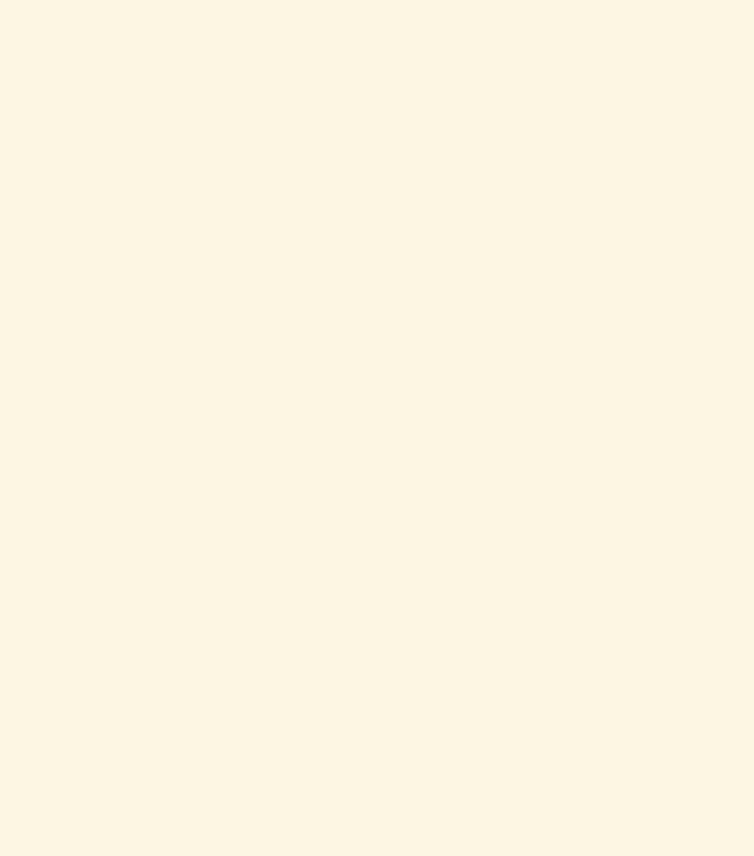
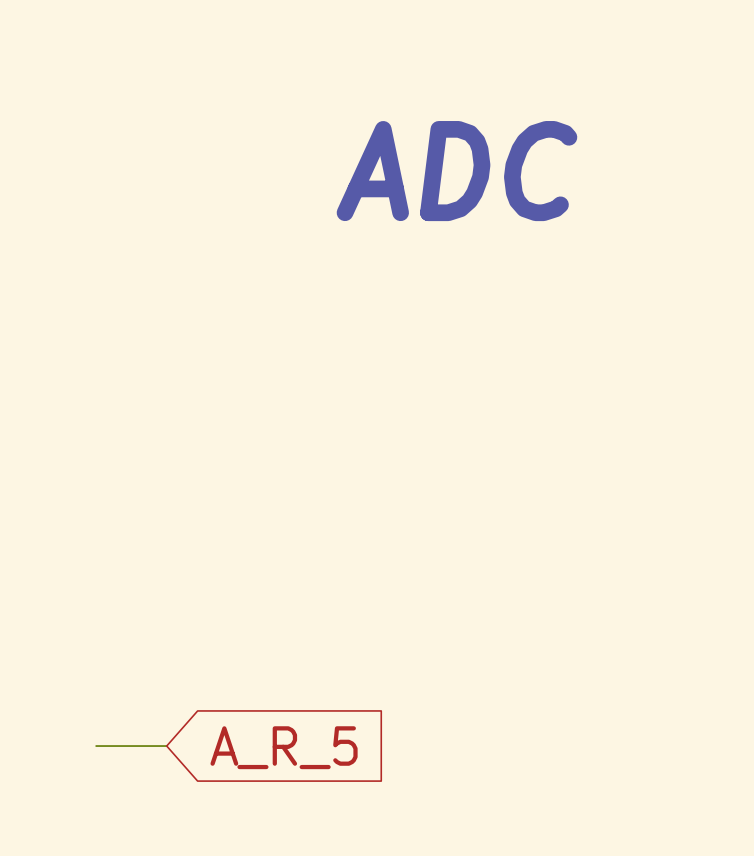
text: none -> ADC (456, 171)
wire: none -> (96, 746) (166, 746)
global label: none -> A_R_5 (284, 747)

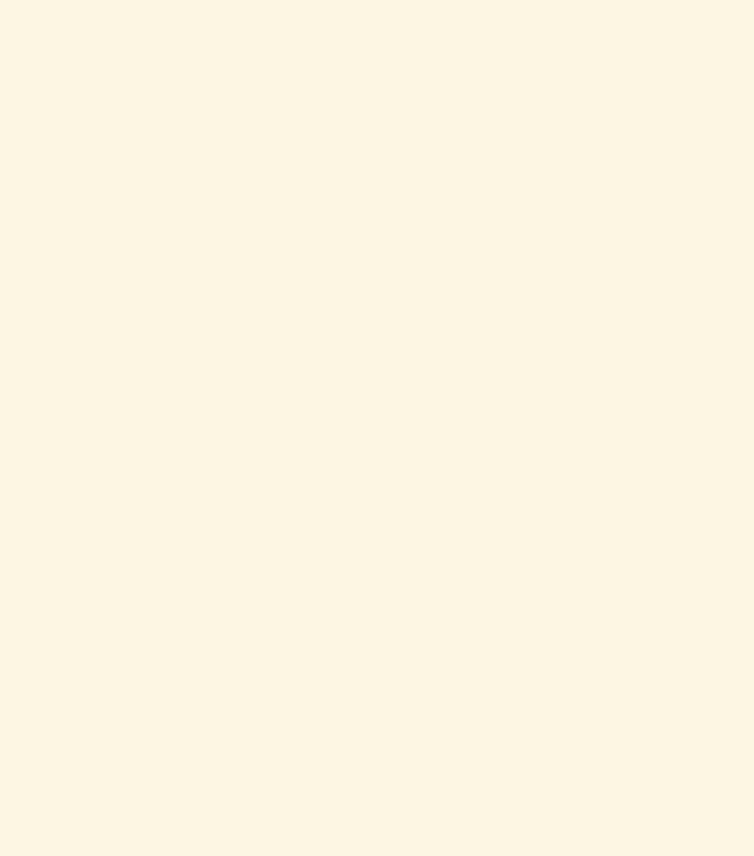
text: ADC (456, 171) -> none
wire: (96, 746) (166, 746) -> none
global label: A_R_5 (284, 747) -> none

